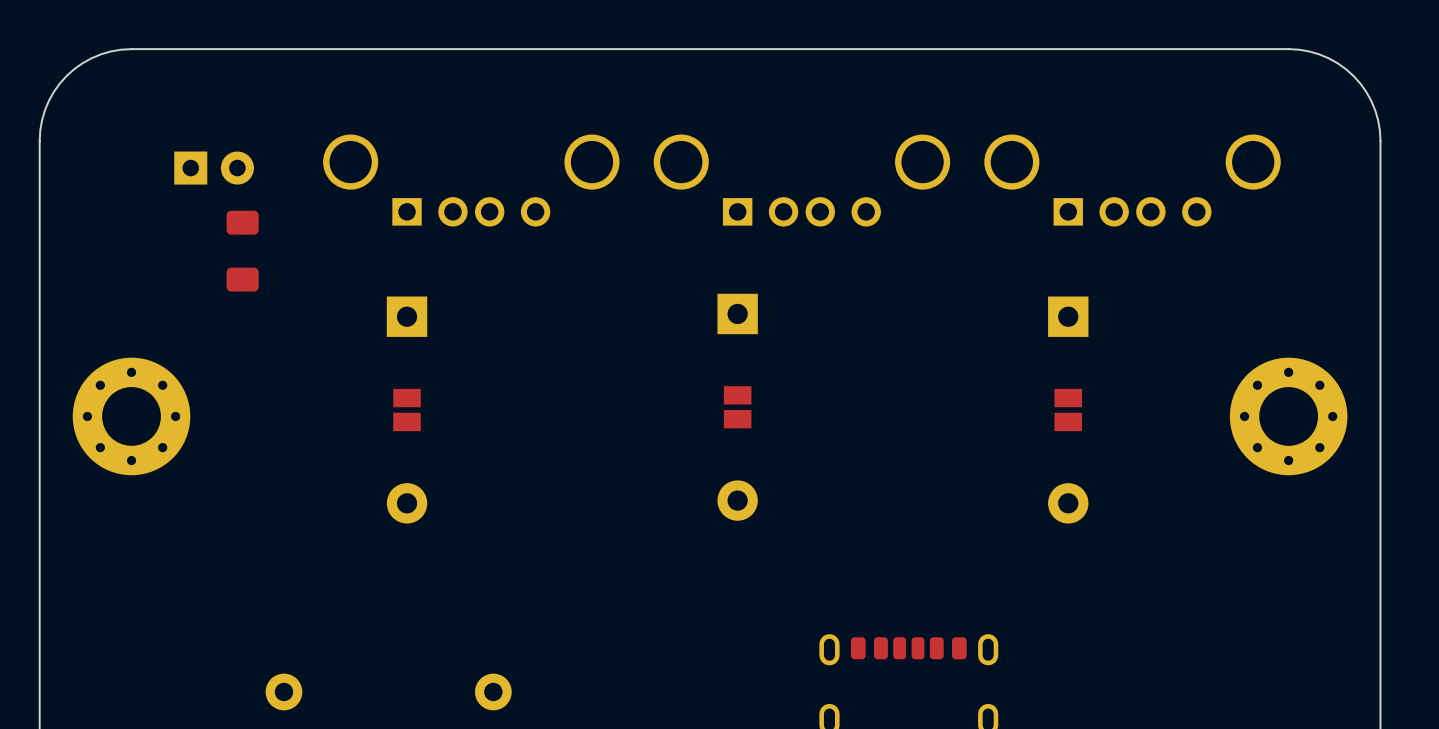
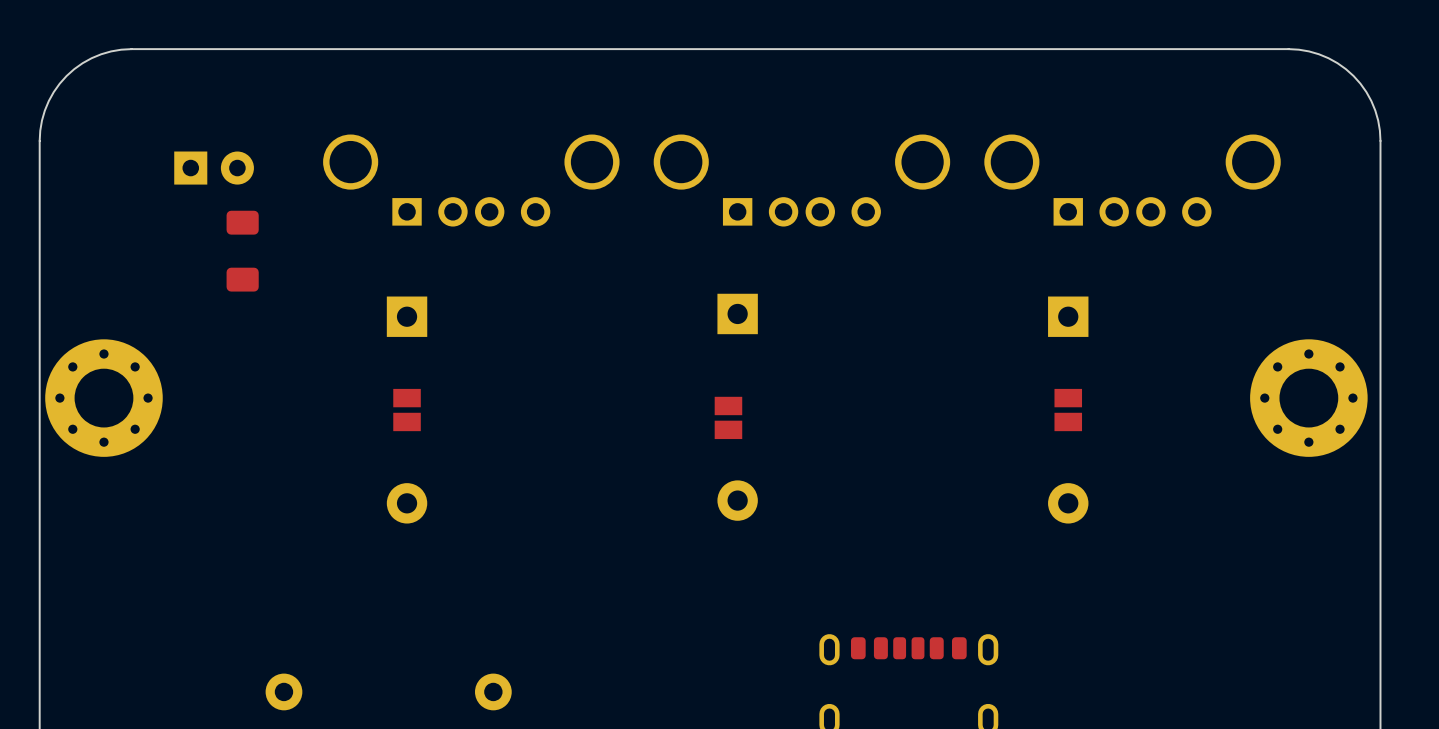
part position: (737, 407) -> (728, 417)
part position: (131, 416) -> (103, 398)
part position: (1288, 416) -> (1308, 398)

